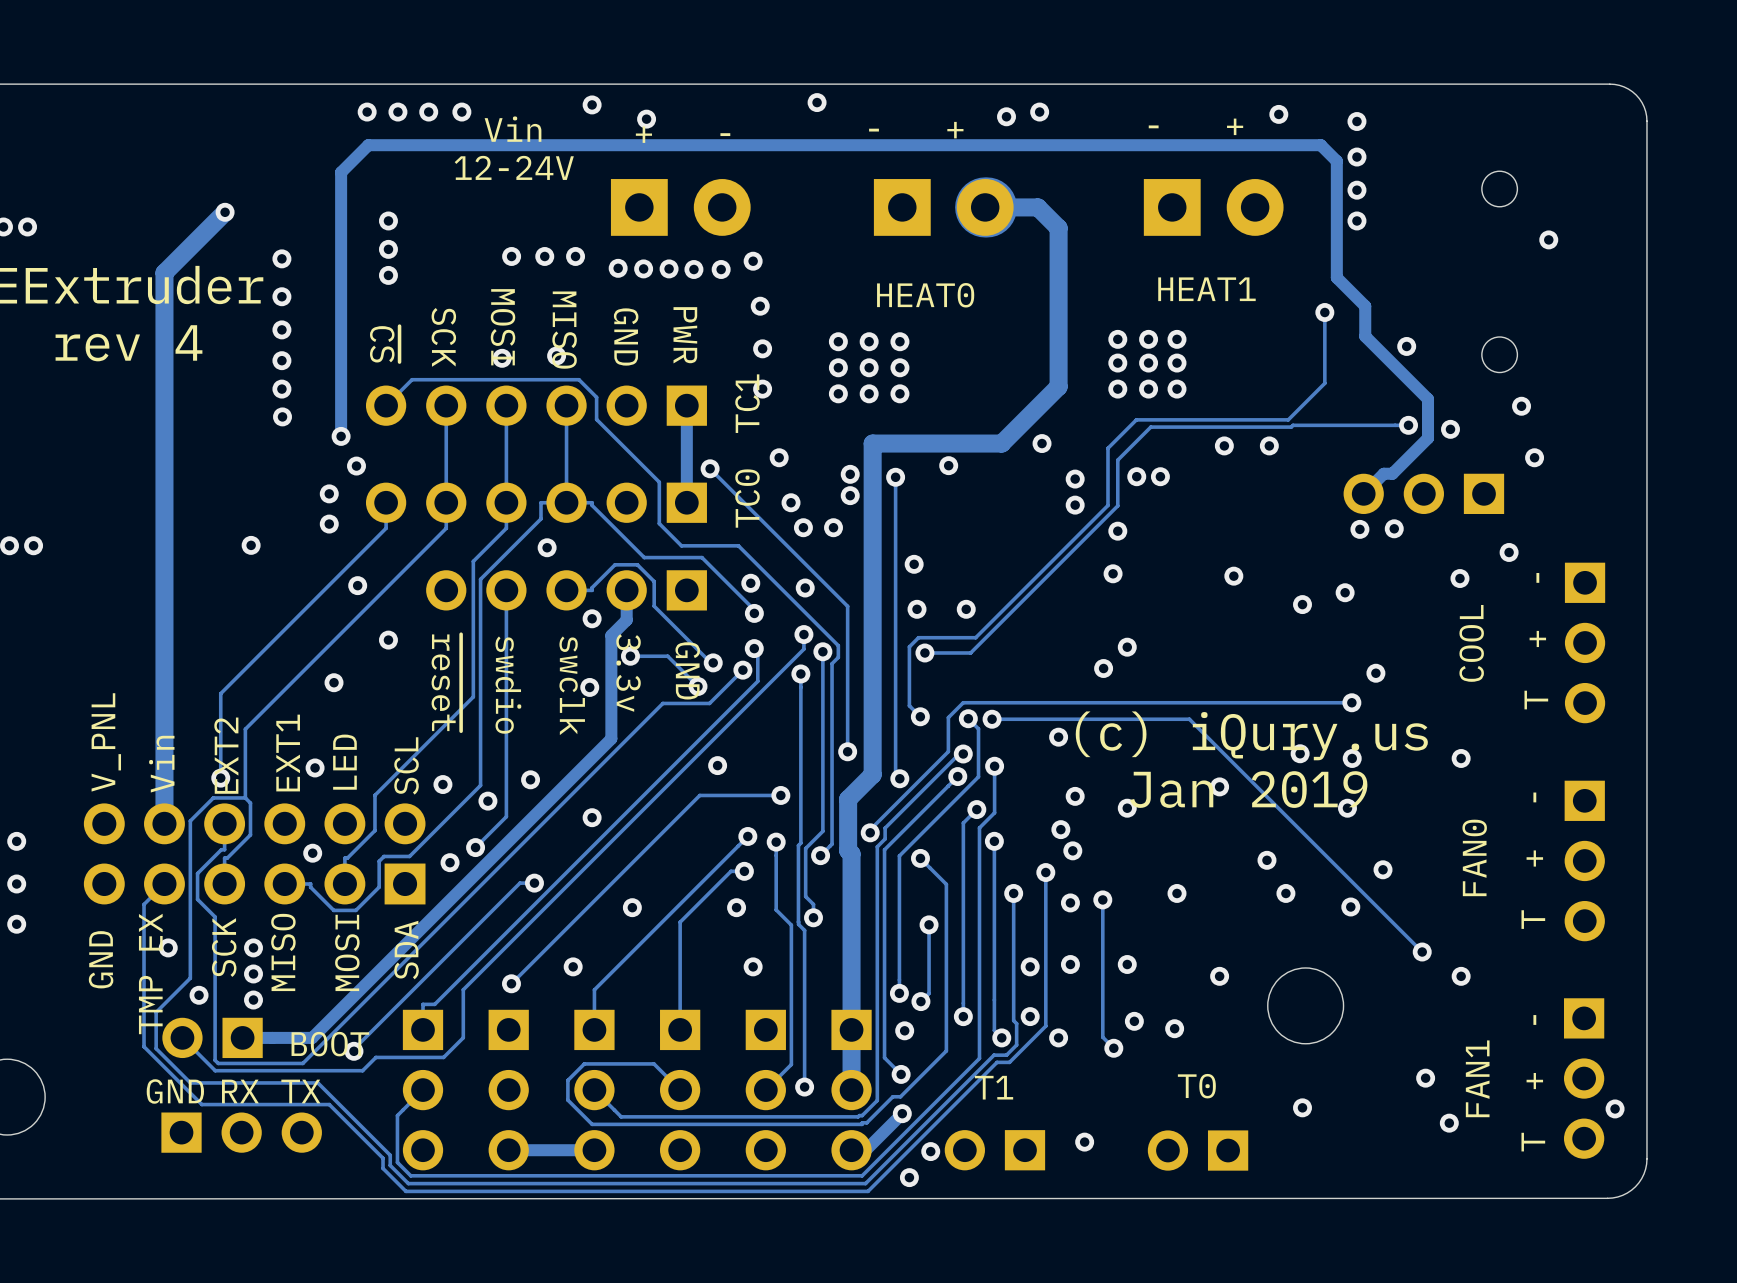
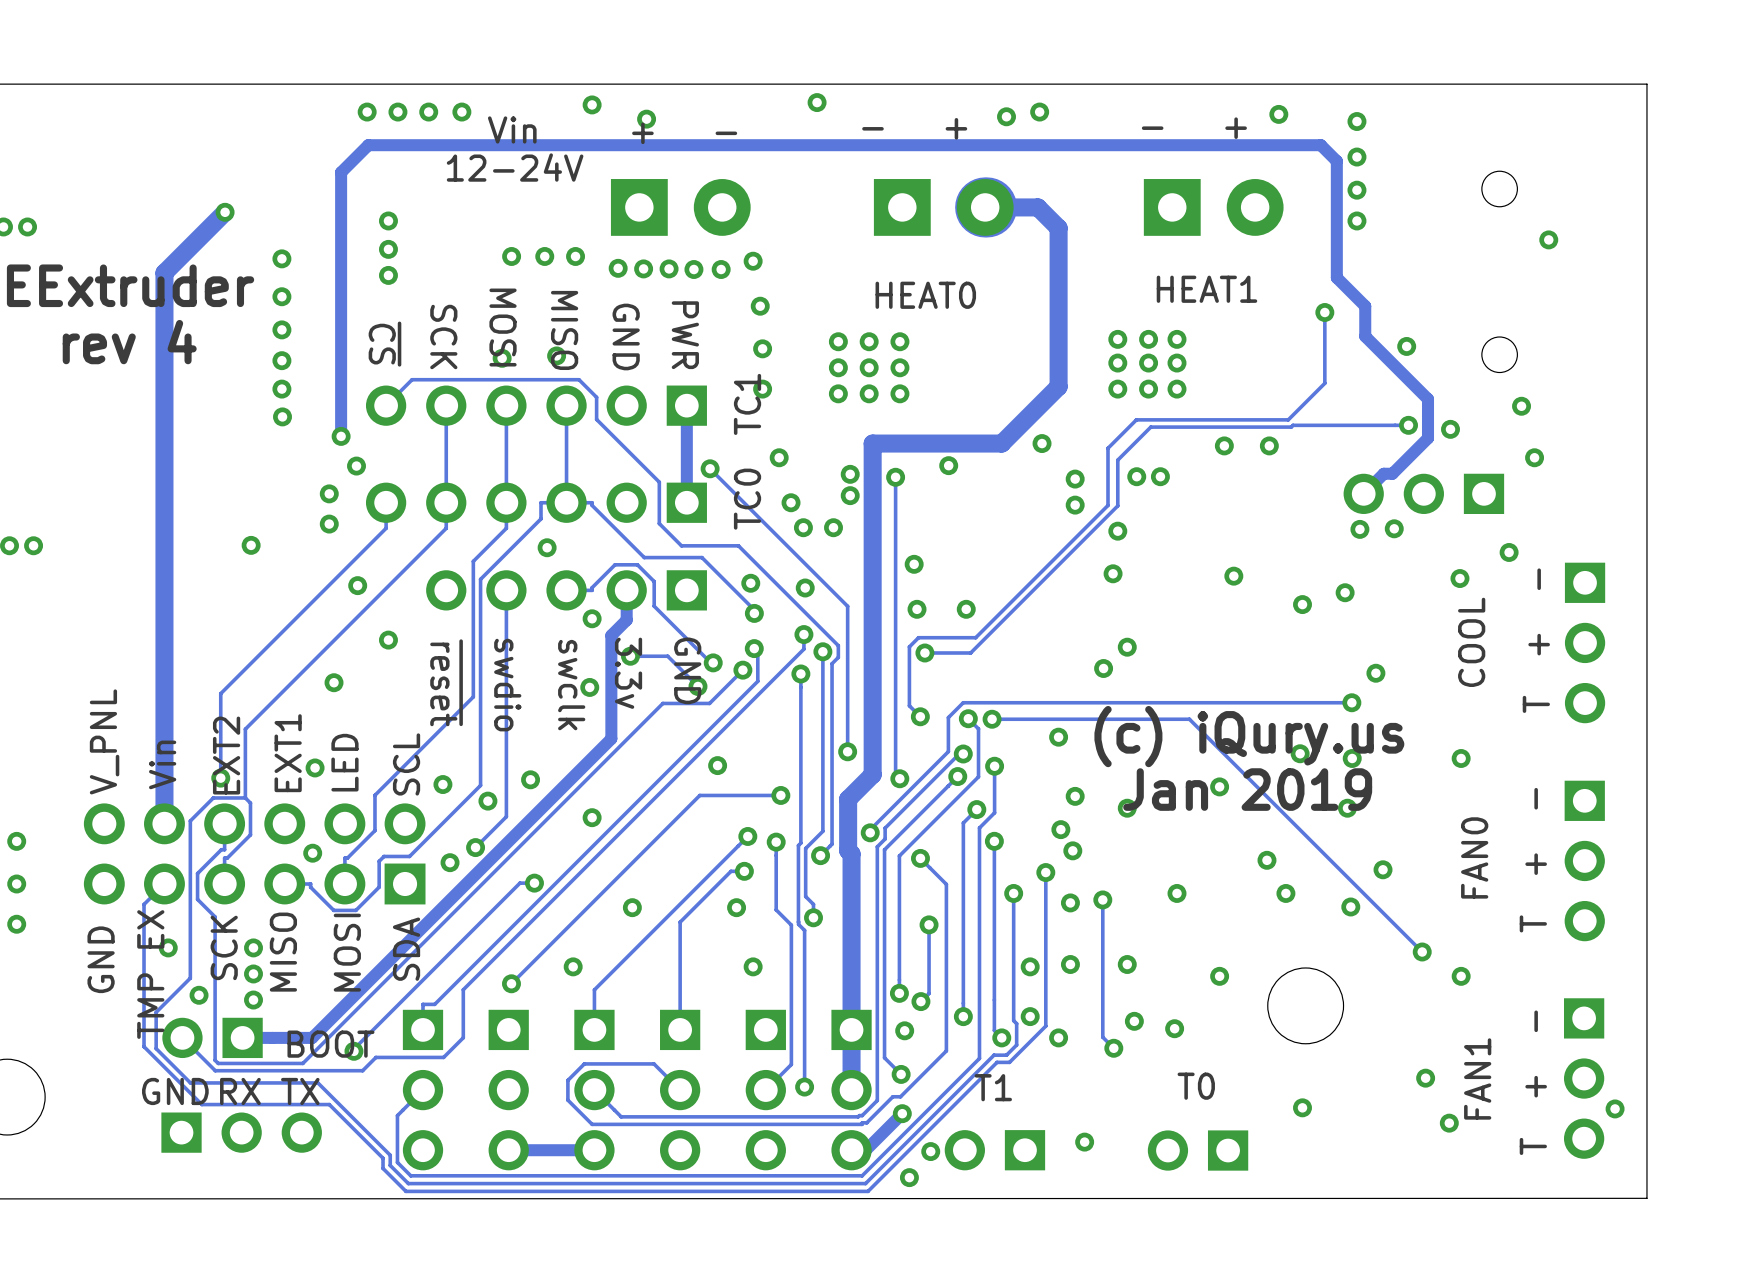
board edge: (1609, 84) (1624, 86) (1636, 94) (1644, 106) (1646, 121) -> (1609, 84) (1646, 84) (1646, 121)
board edge: (1646, 1158) (1643, 1174) (1635, 1186) (1622, 1195) (1607, 1198) -> (1646, 1158) (1646, 1198) (1607, 1198)

